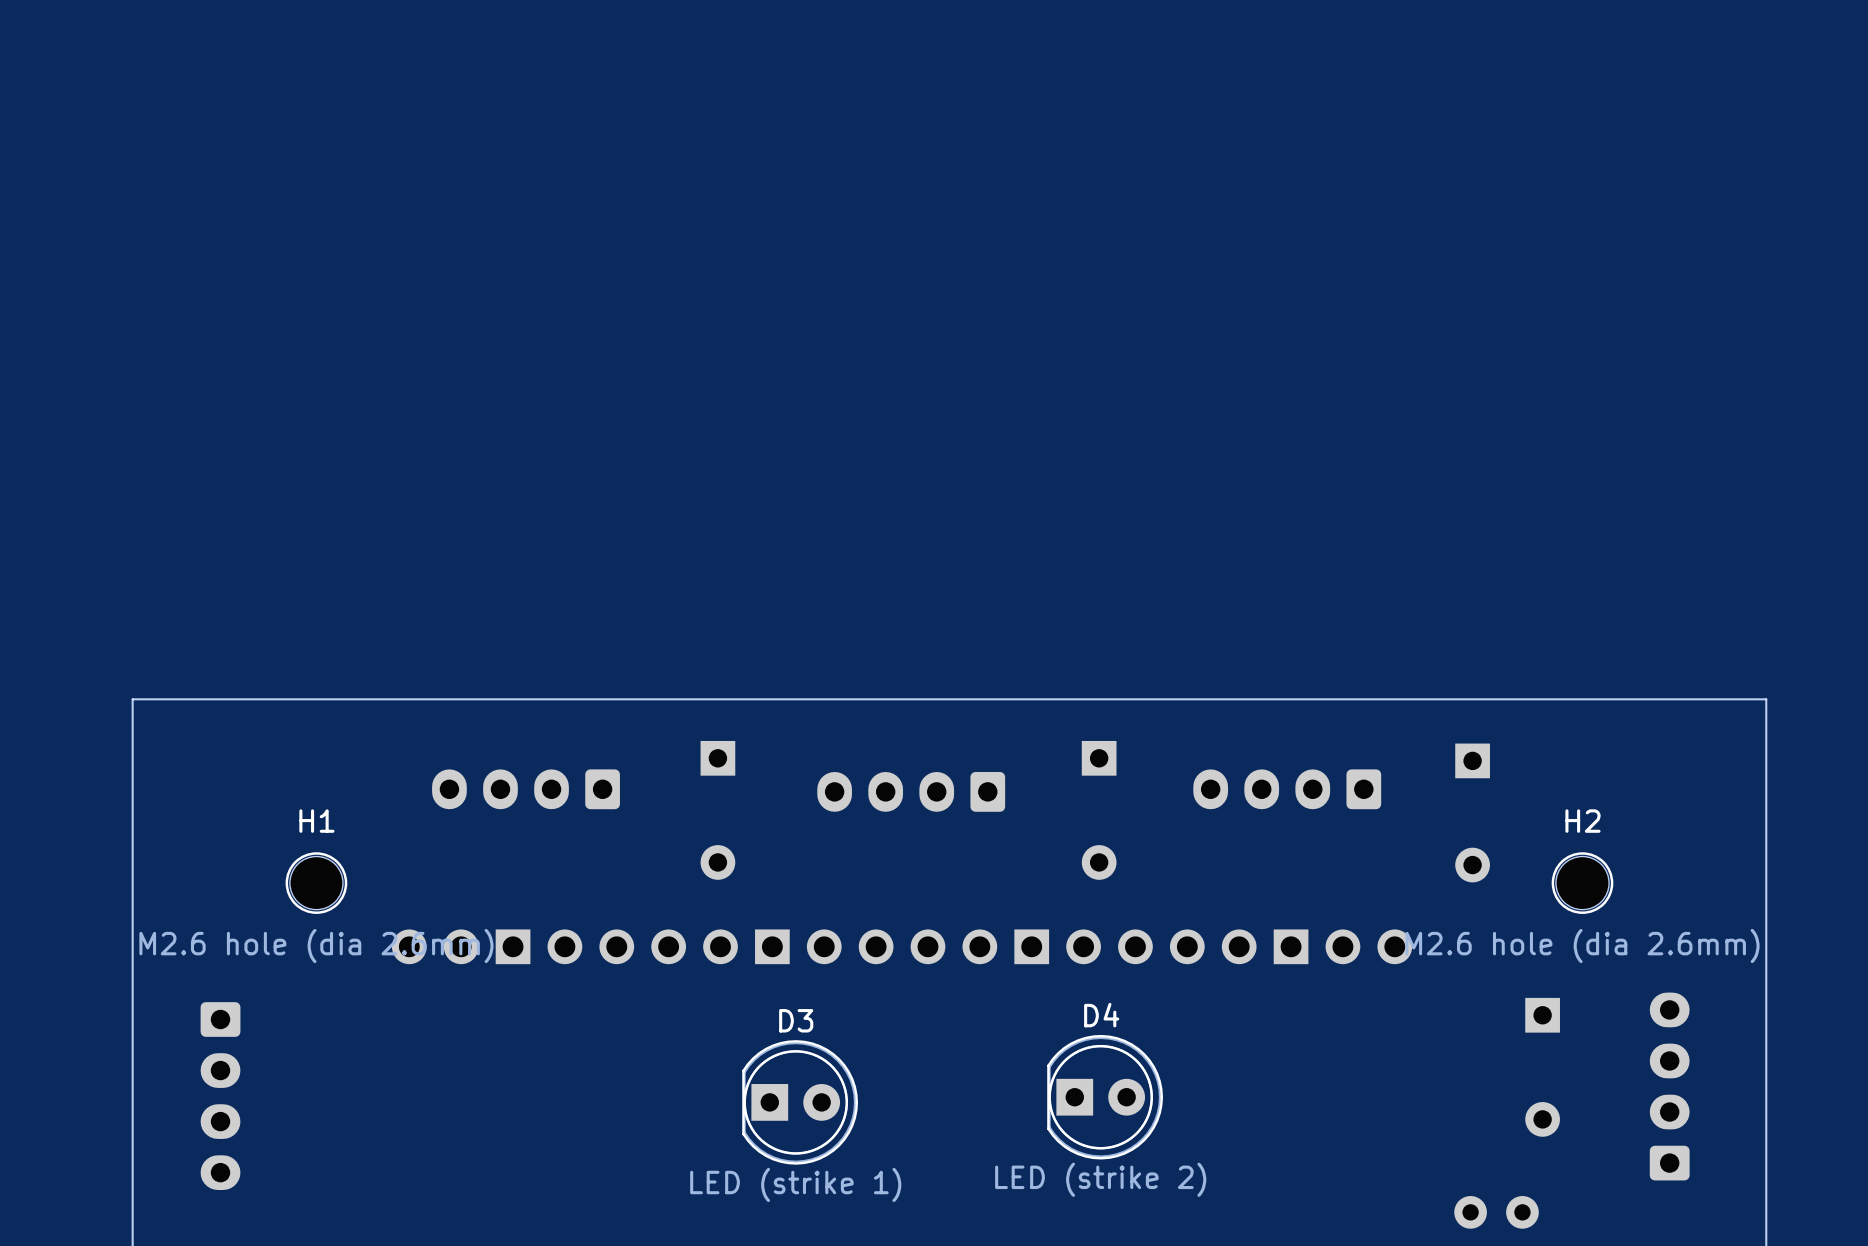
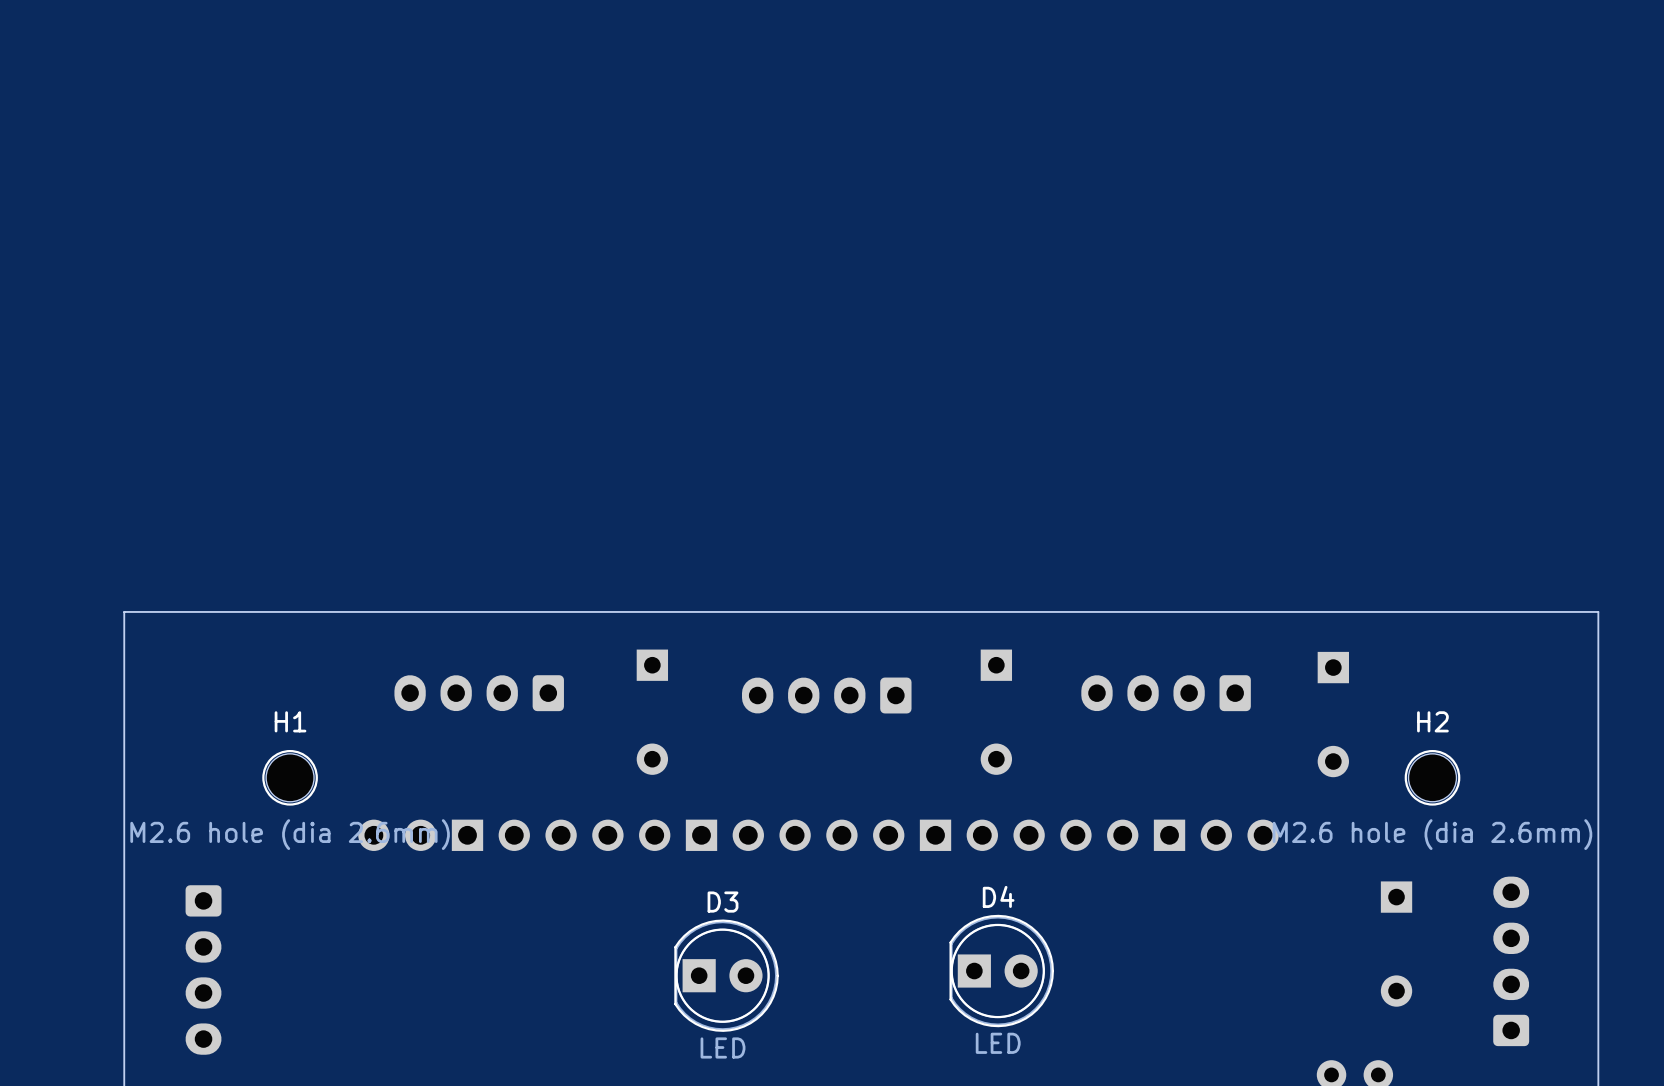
D4 value: LED (strike 2) (1100, 1179) -> LED (998, 1043)
D3 value: LED (strike 1) (795, 1184) -> LED (723, 1047)

